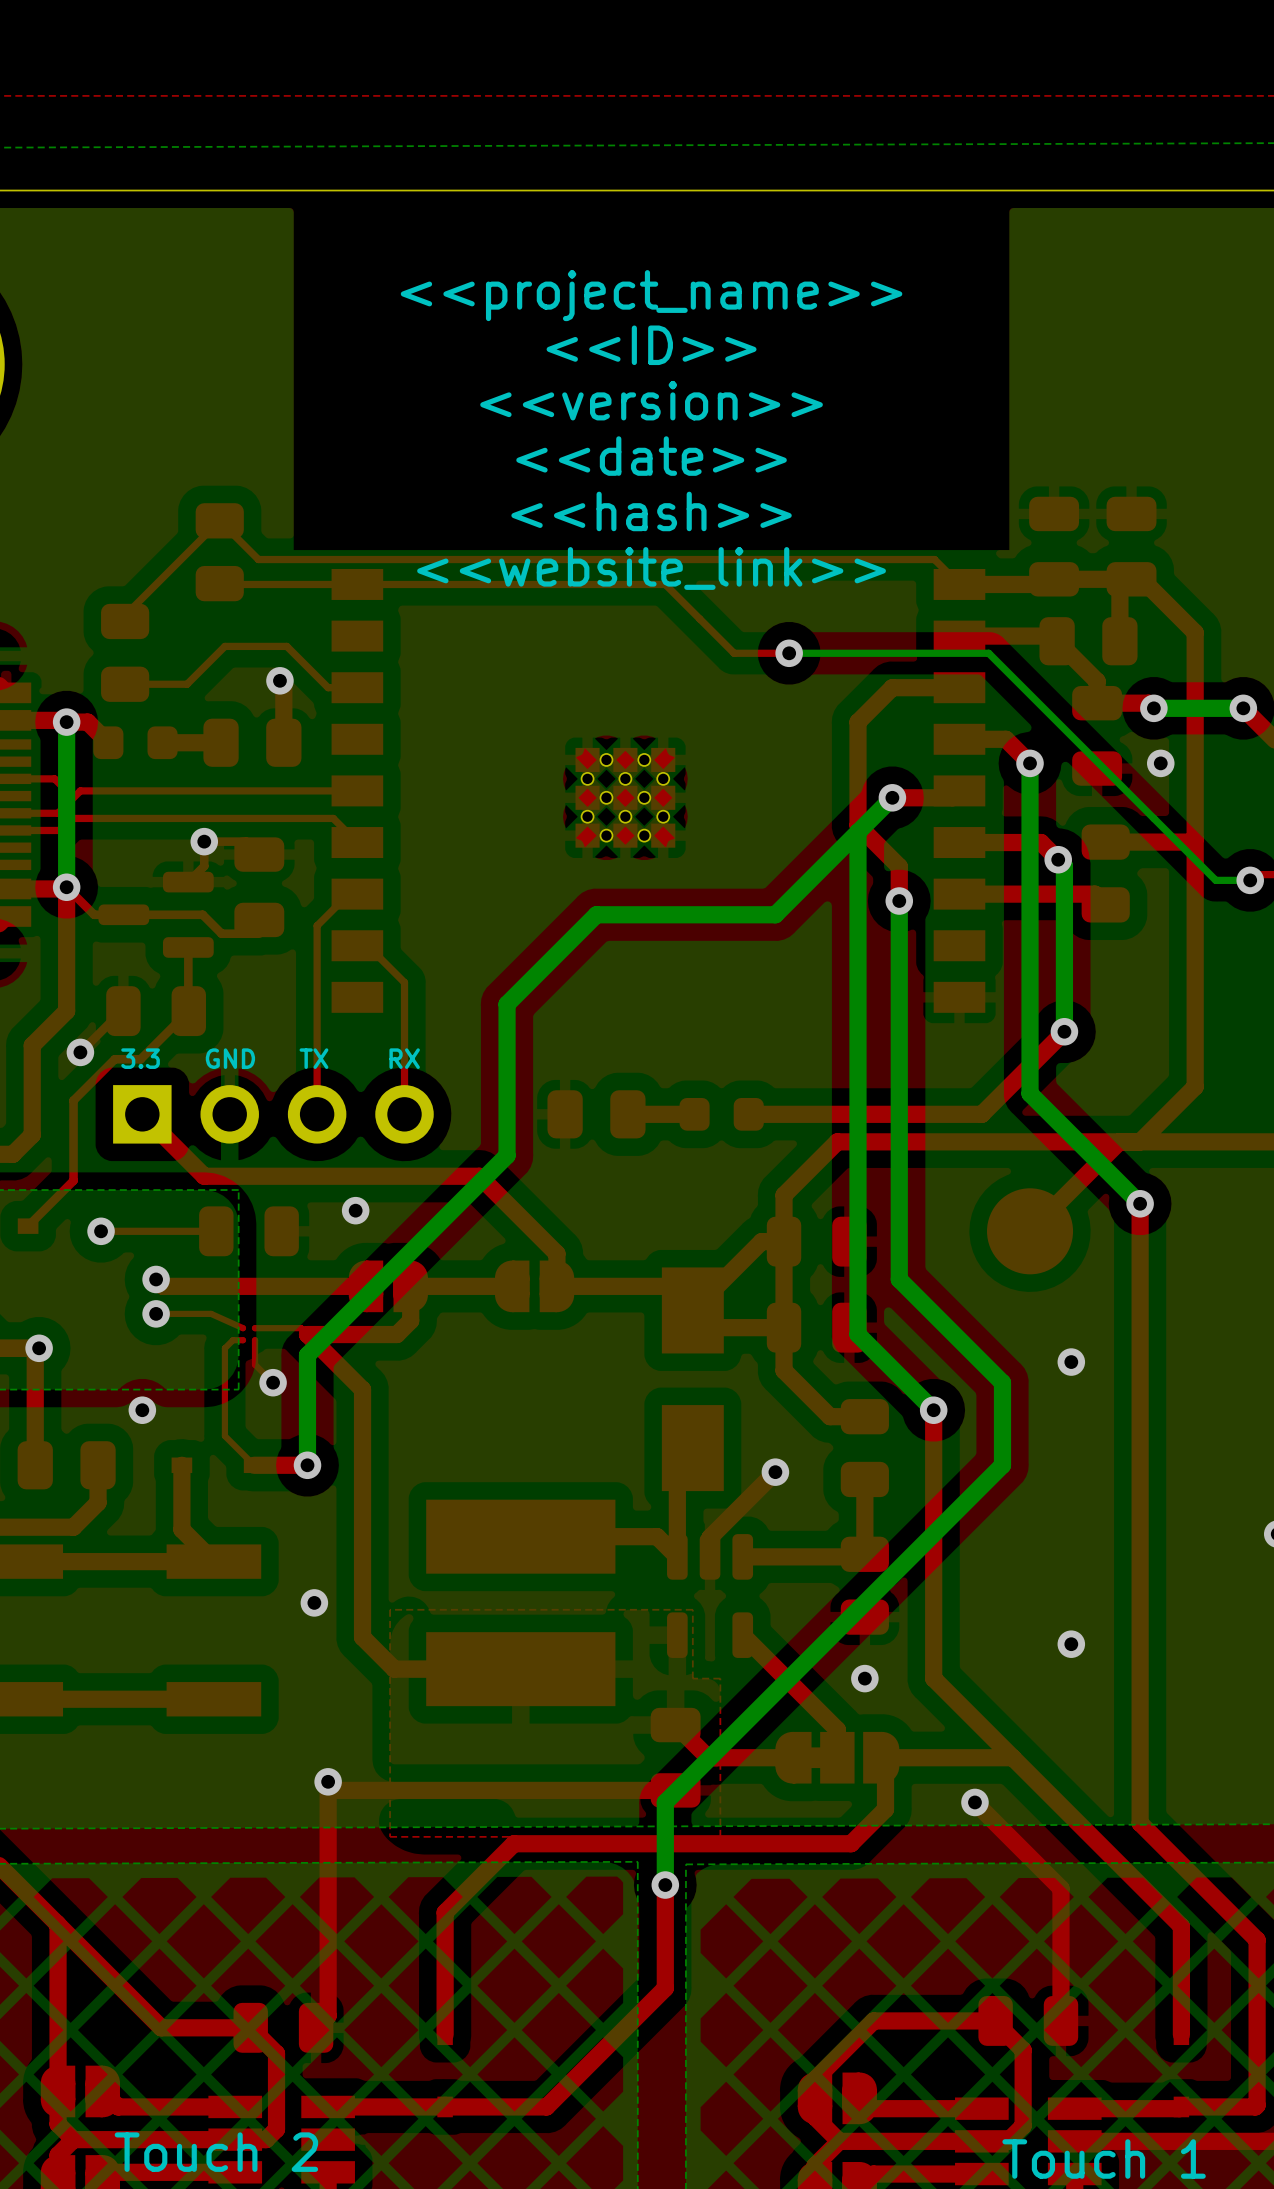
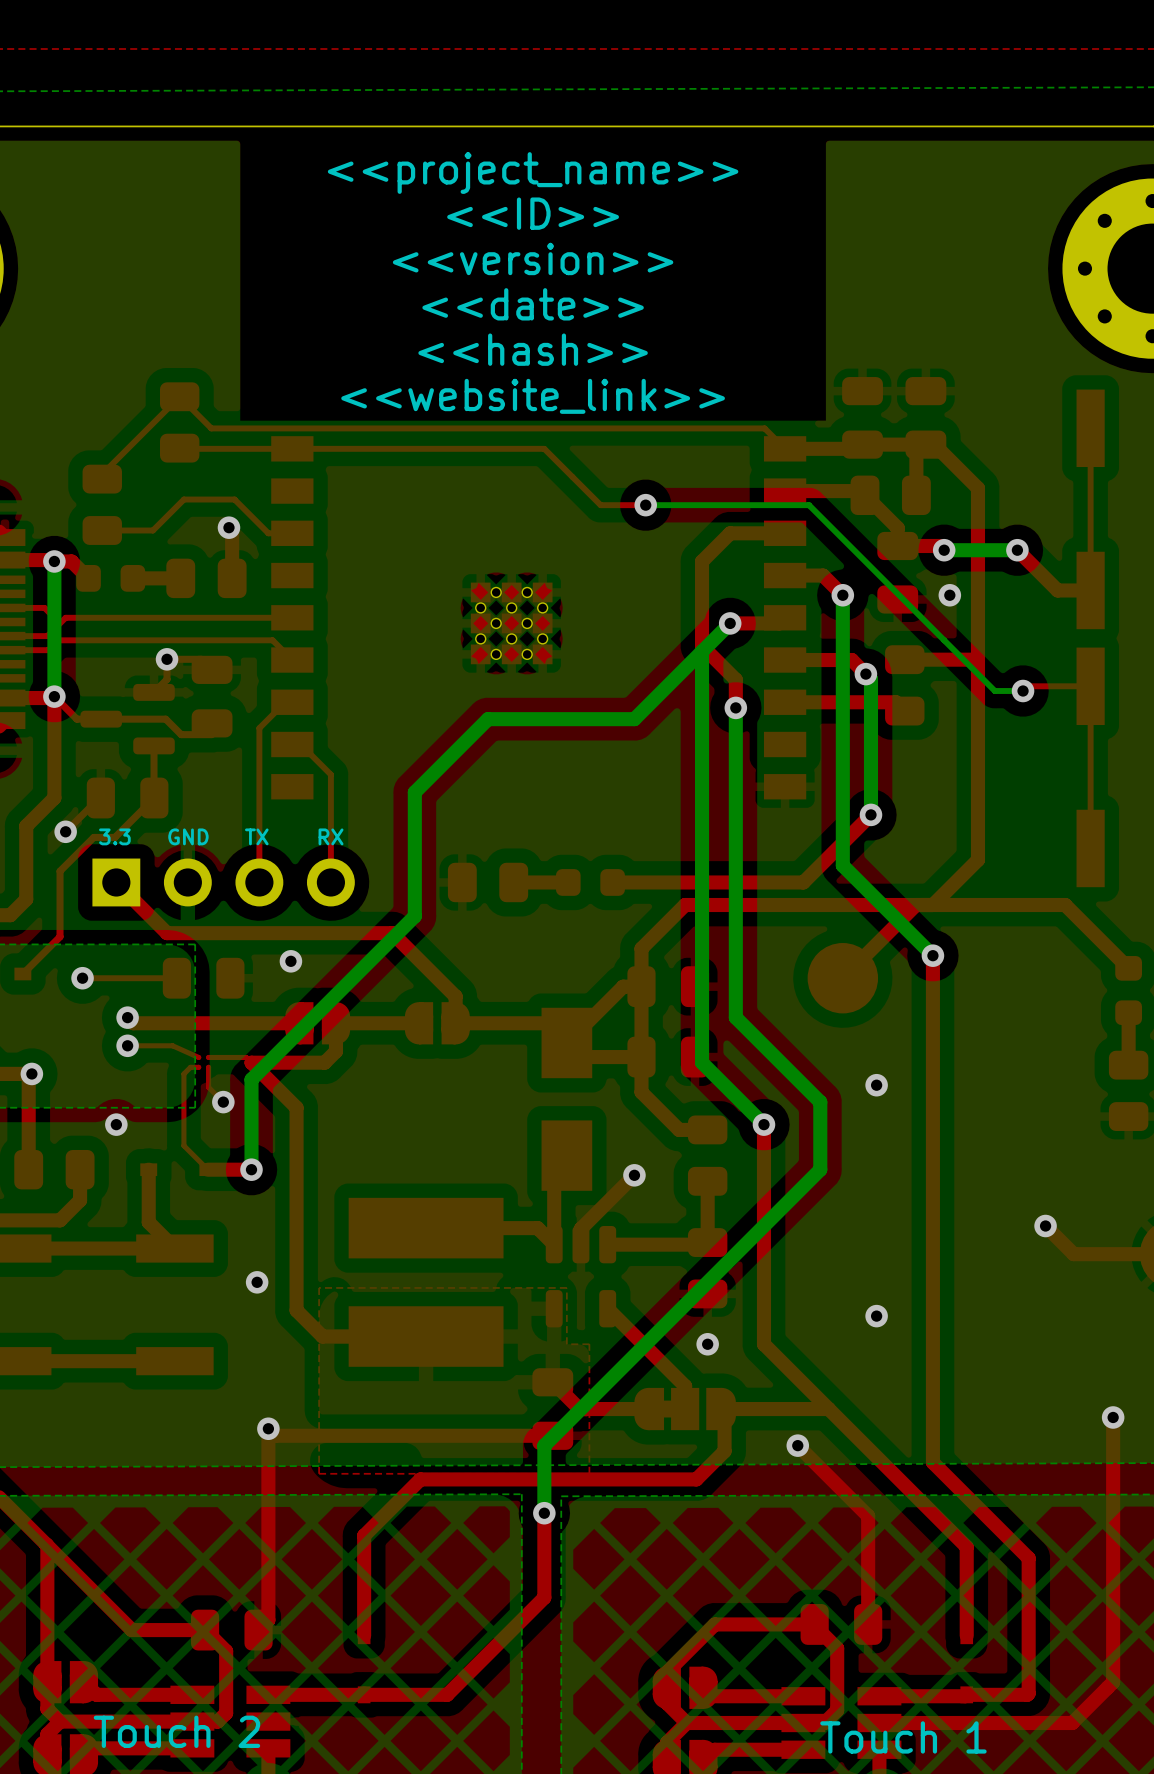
text position: <<project_name>> (651, 295) -> <<project_name>> (533, 173)
text position: <<ID>> (651, 345) -> <<ID>> (533, 213)
text position: <<version>> (651, 400) -> <<version>> (533, 258)
text position: <<date>> (651, 456) -> <<date>> (533, 304)
text position: <<hash>> (651, 511) -> <<hash>> (533, 349)
text position: <<website_link>> (651, 568) -> <<website_link>> (533, 396)

